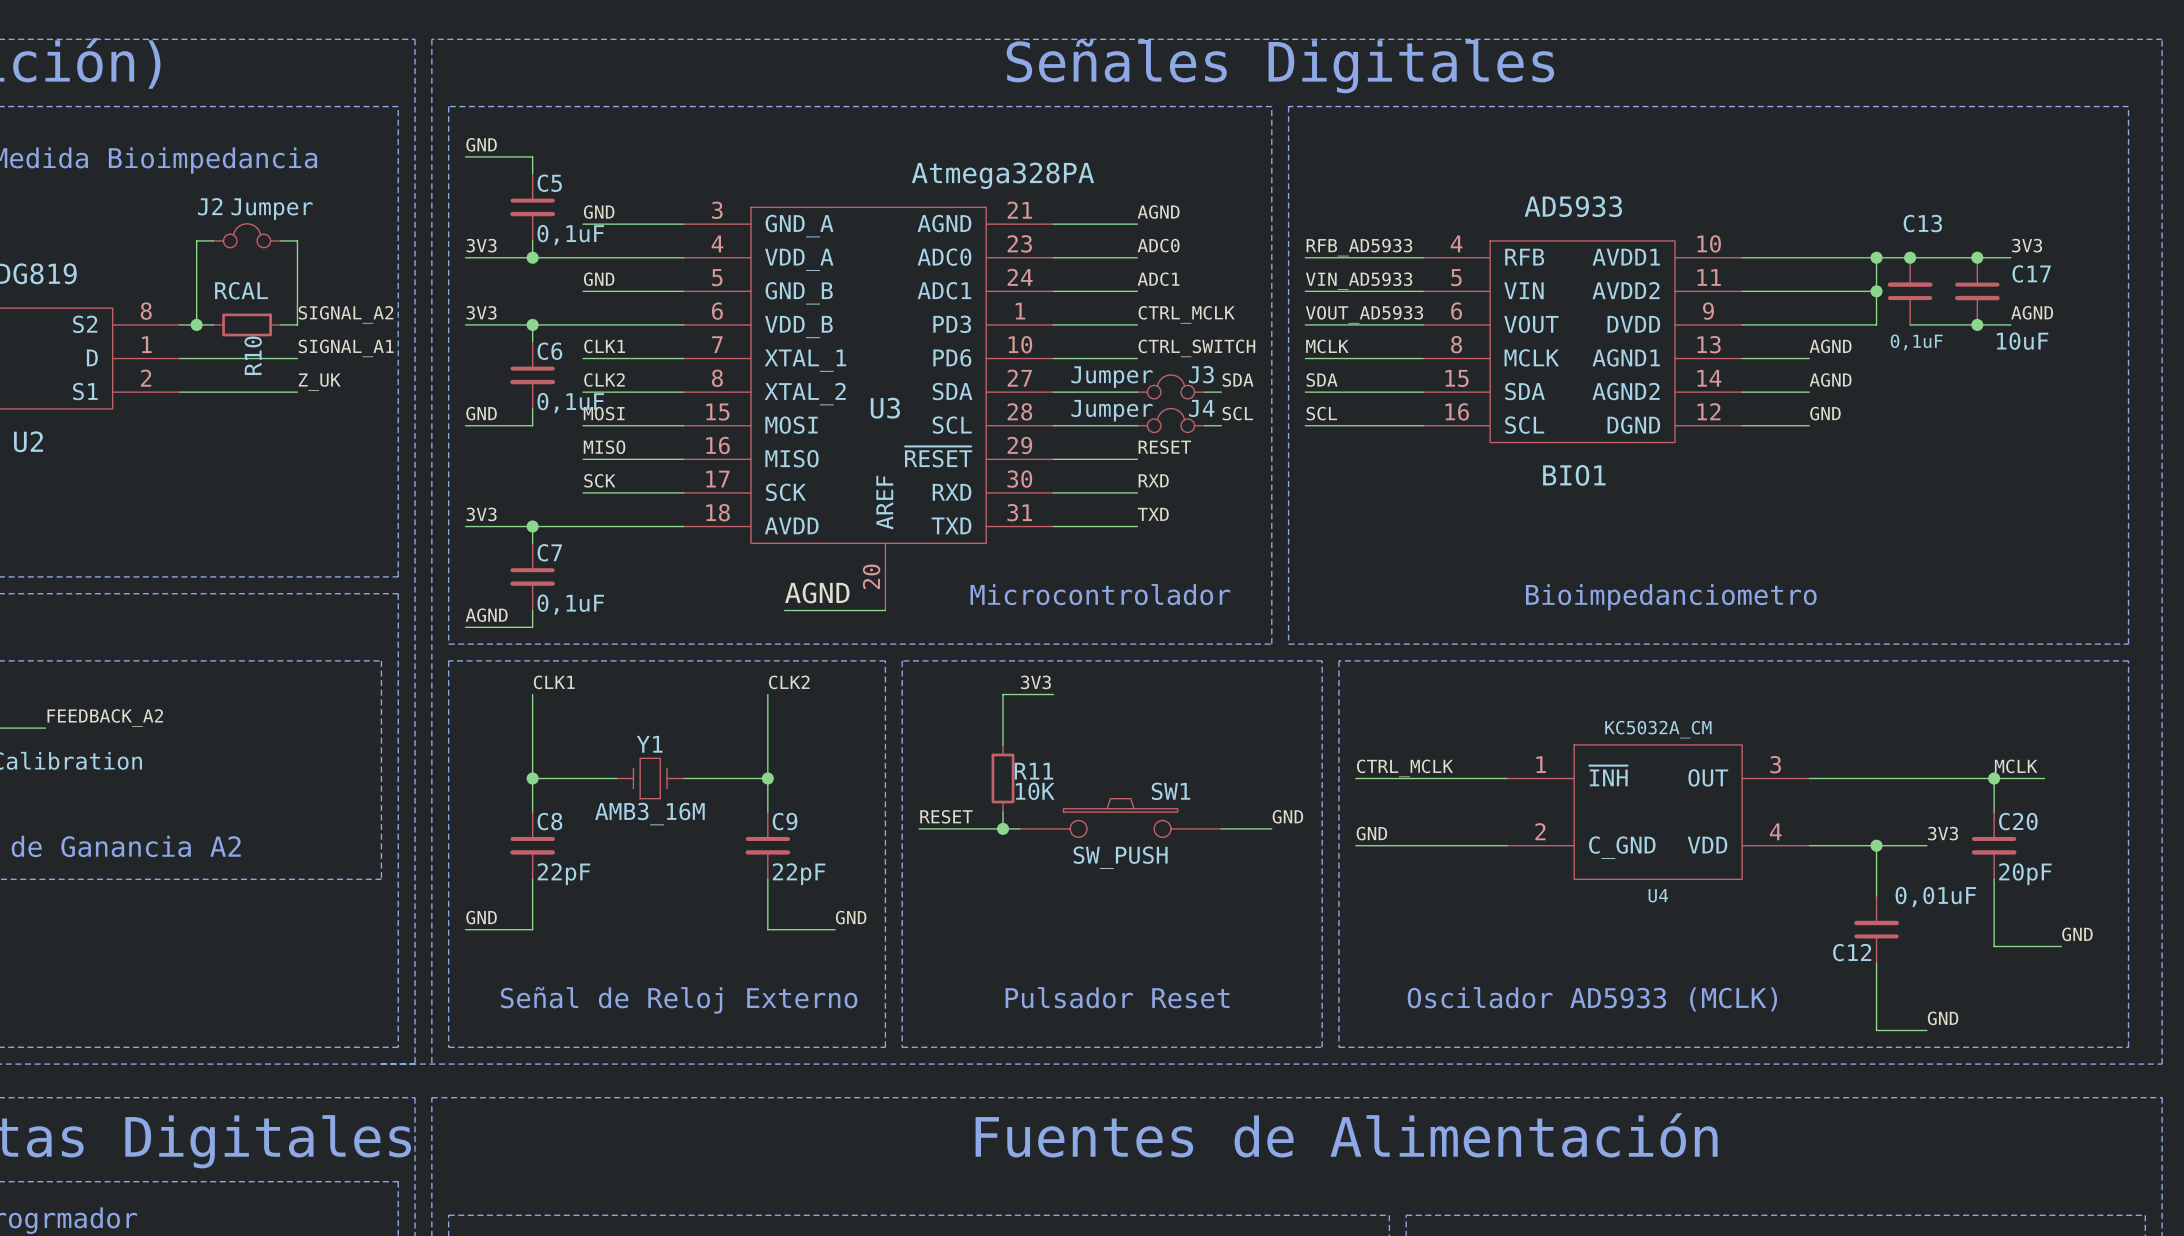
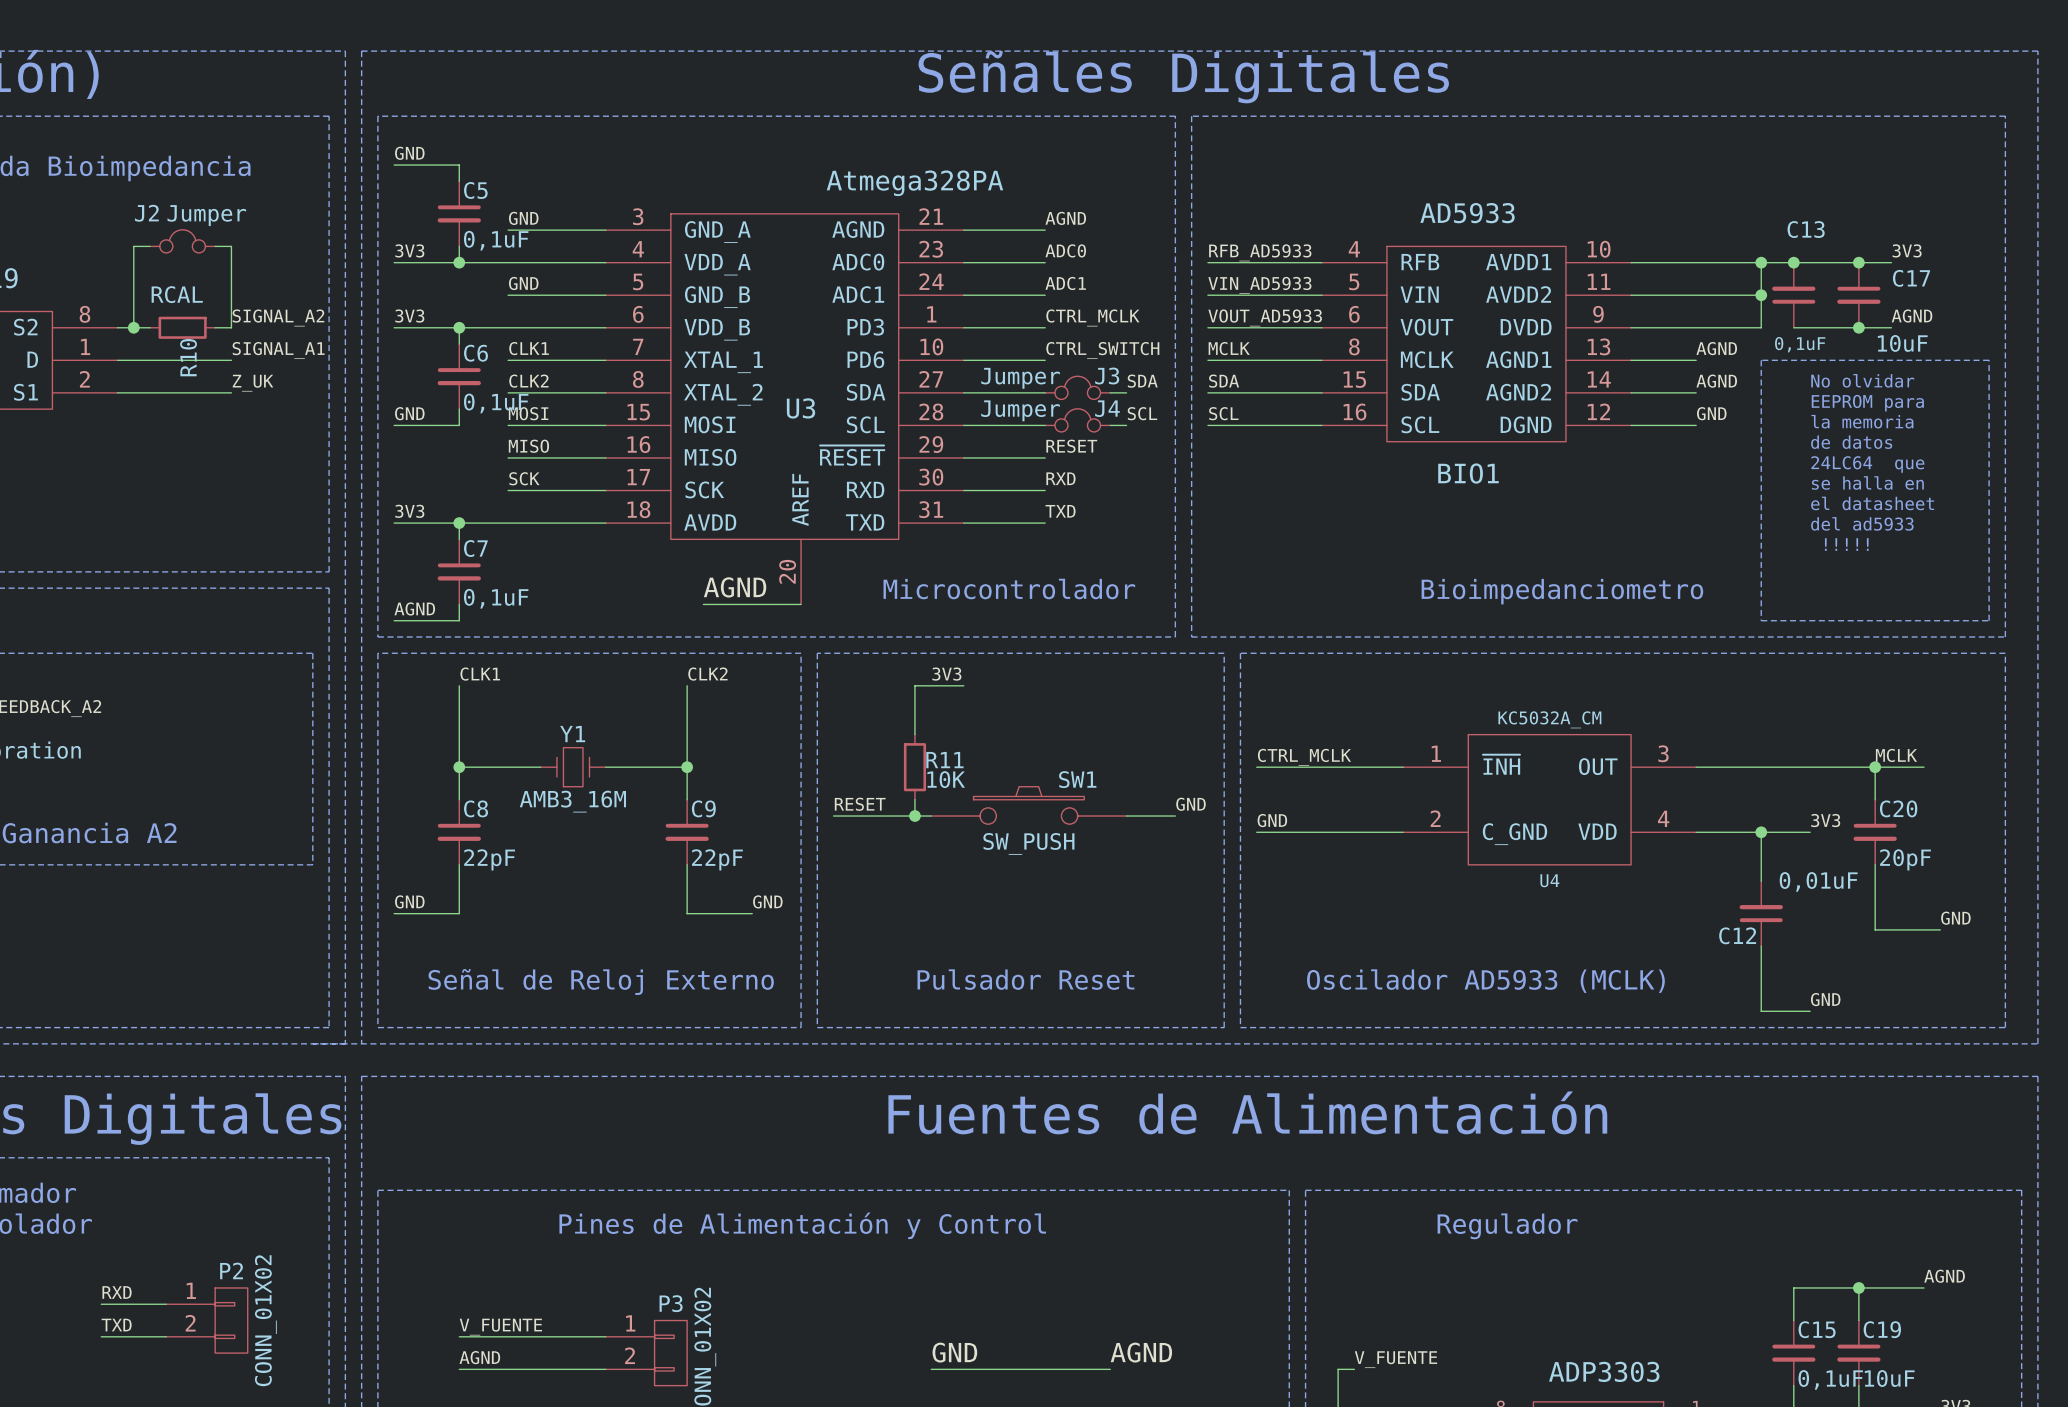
line: none -> (1761, 360) (1761, 620) (1989, 620) (1989, 360) (1761, 360)
text: none -> No olvidar (1862, 380)
text: none -> EEPROM para (1867, 403)
text: none -> la memoria (1862, 421)
text: none -> de datos (1851, 442)
text: none -> 24LC64 que (1867, 464)
text: none -> se halla en (1867, 483)
text: none -> el datasheet (1872, 503)
text: none -> del ad5933 (1862, 523)
text: none -> !!!!! (1846, 544)

